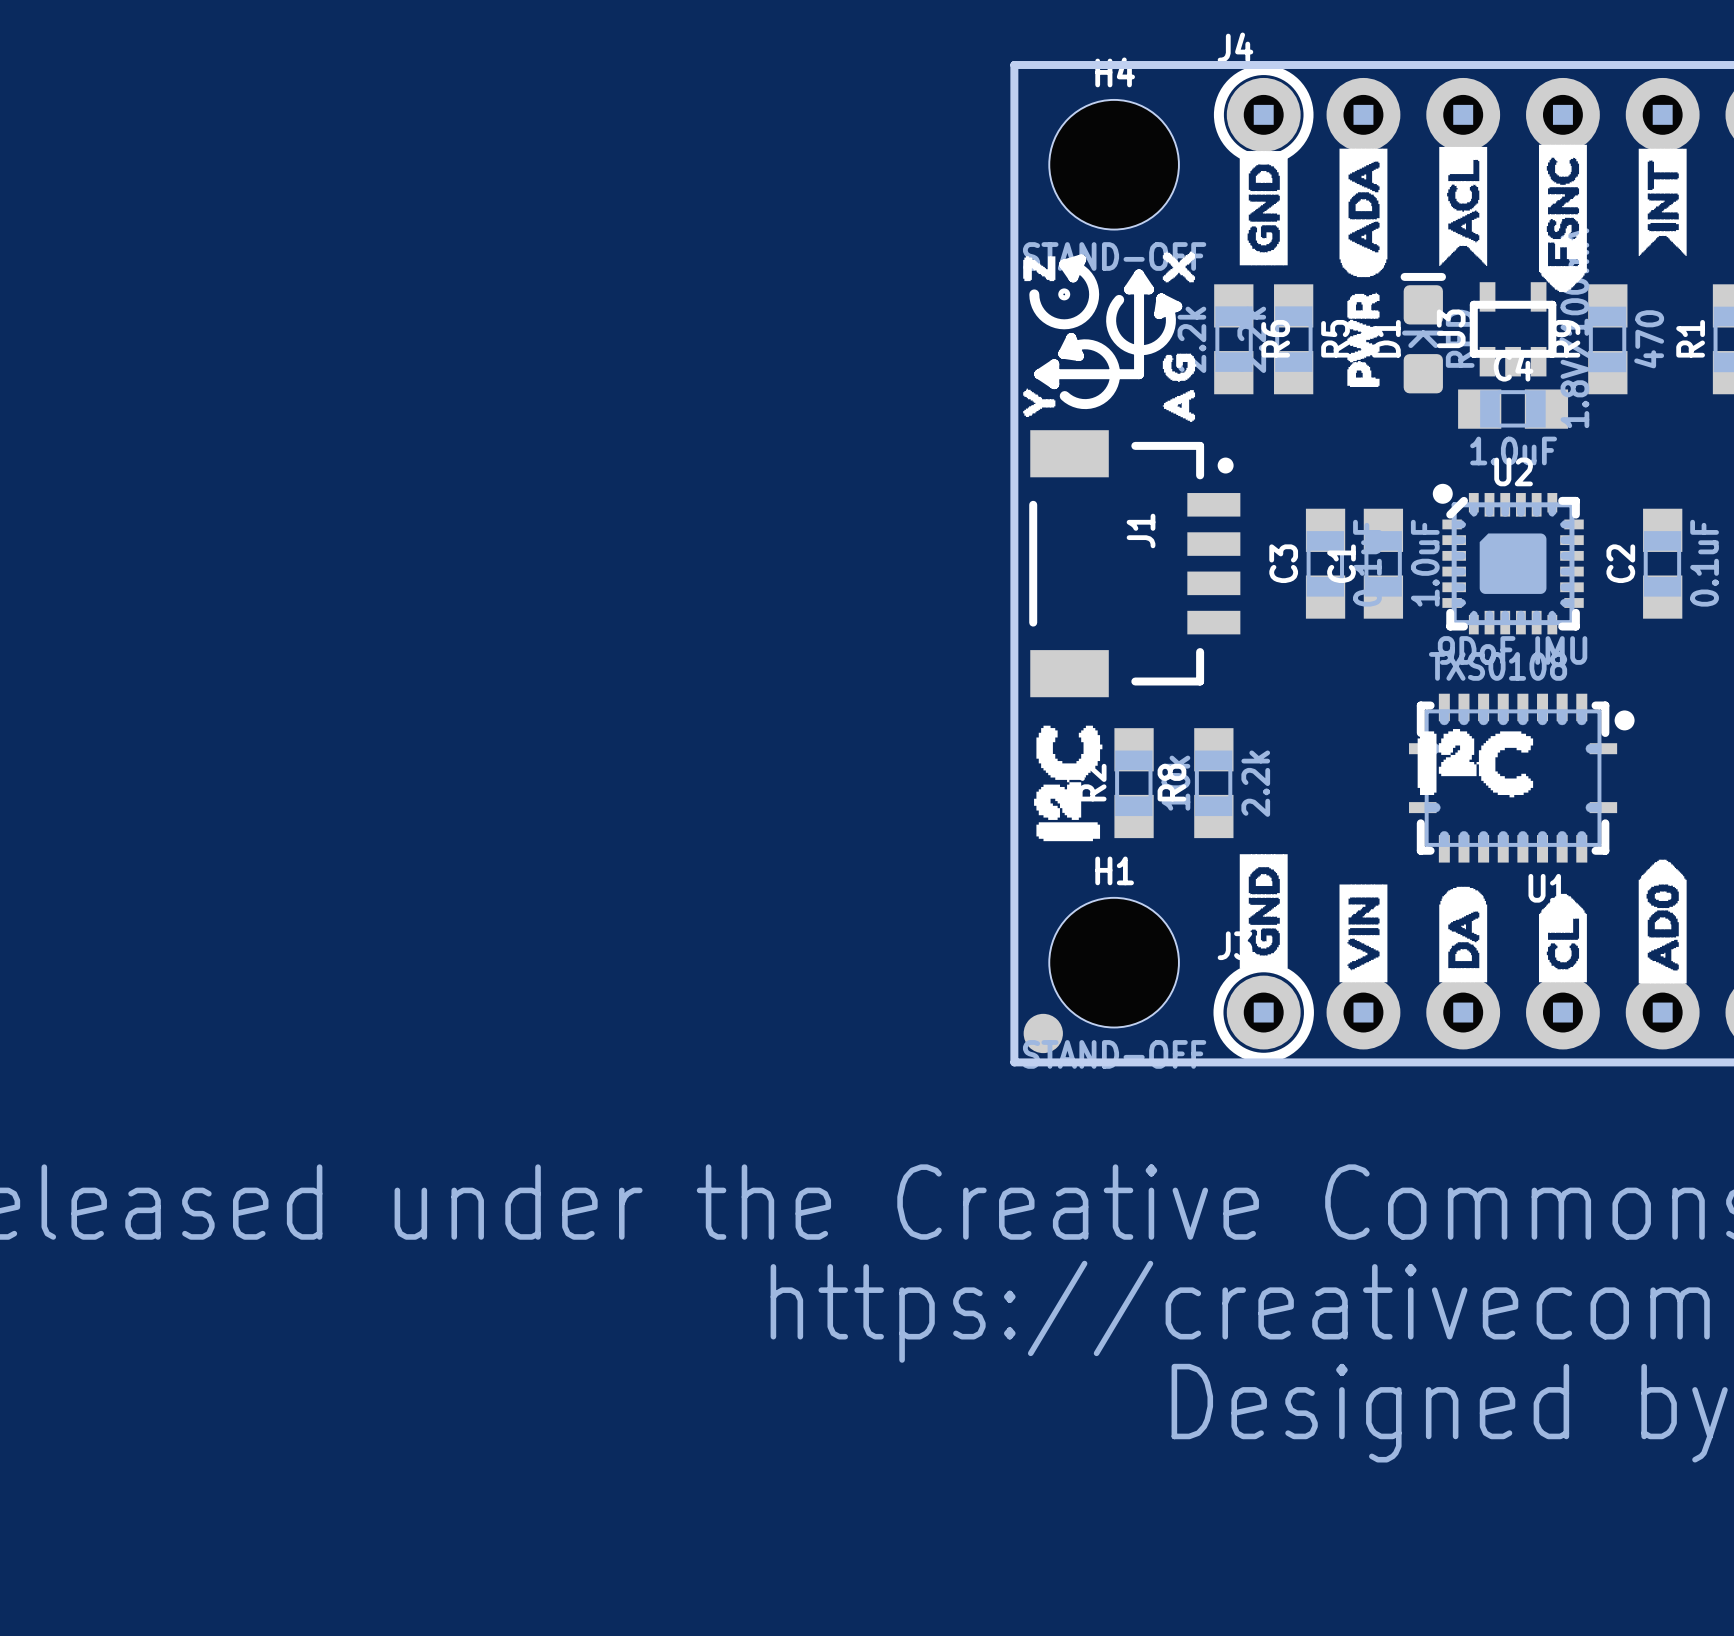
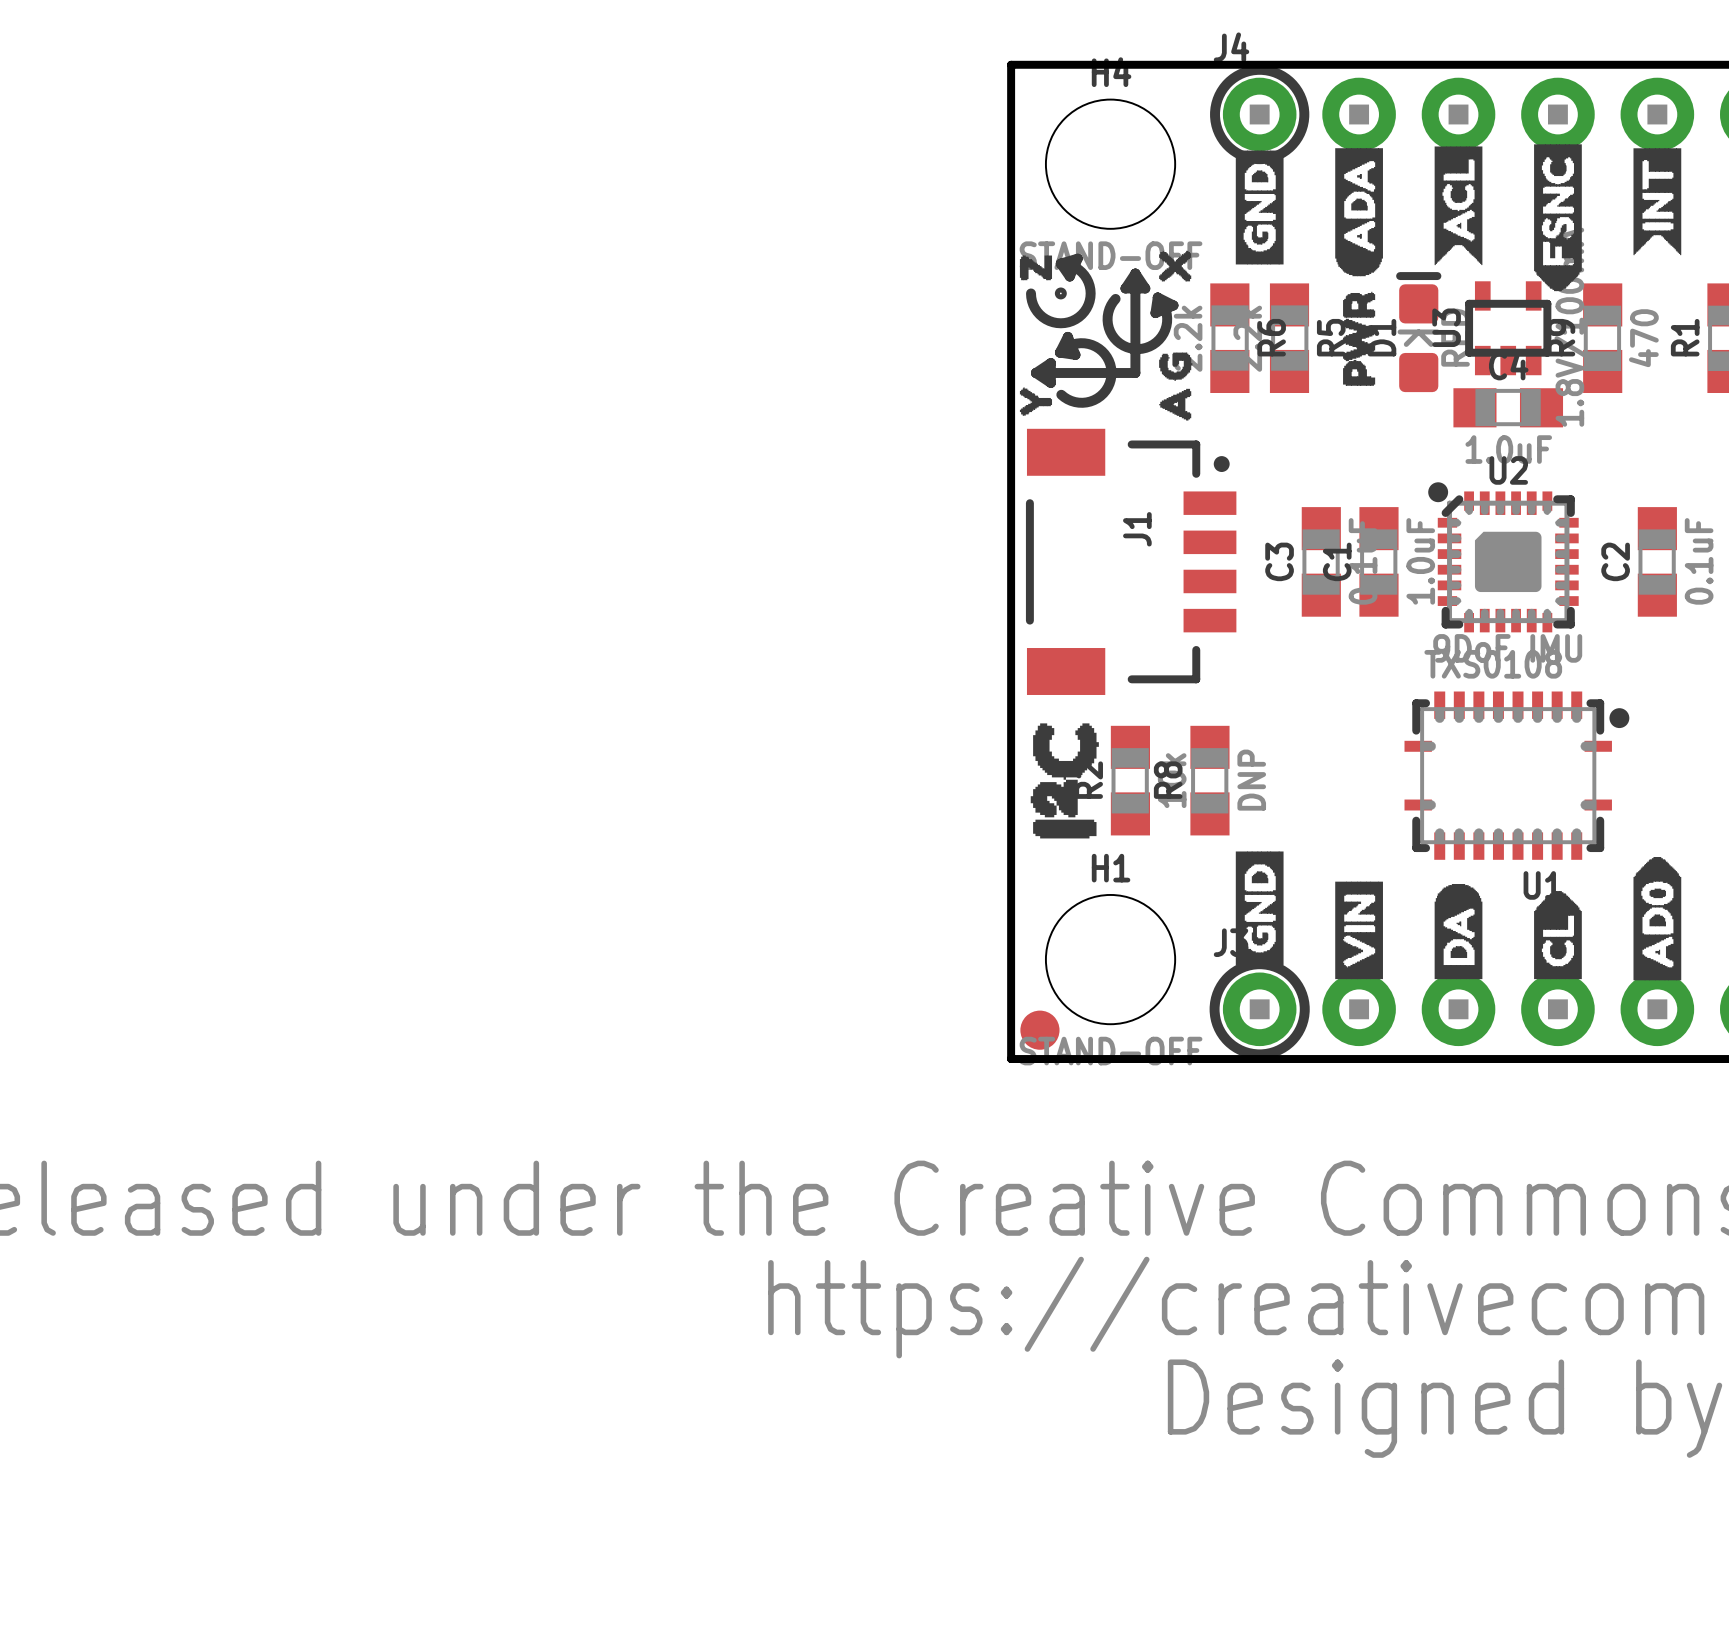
drawing: [1417, 729, 1534, 798] -> none
R8 value: 2.2k (1255, 783) -> DNP (1251, 780)

